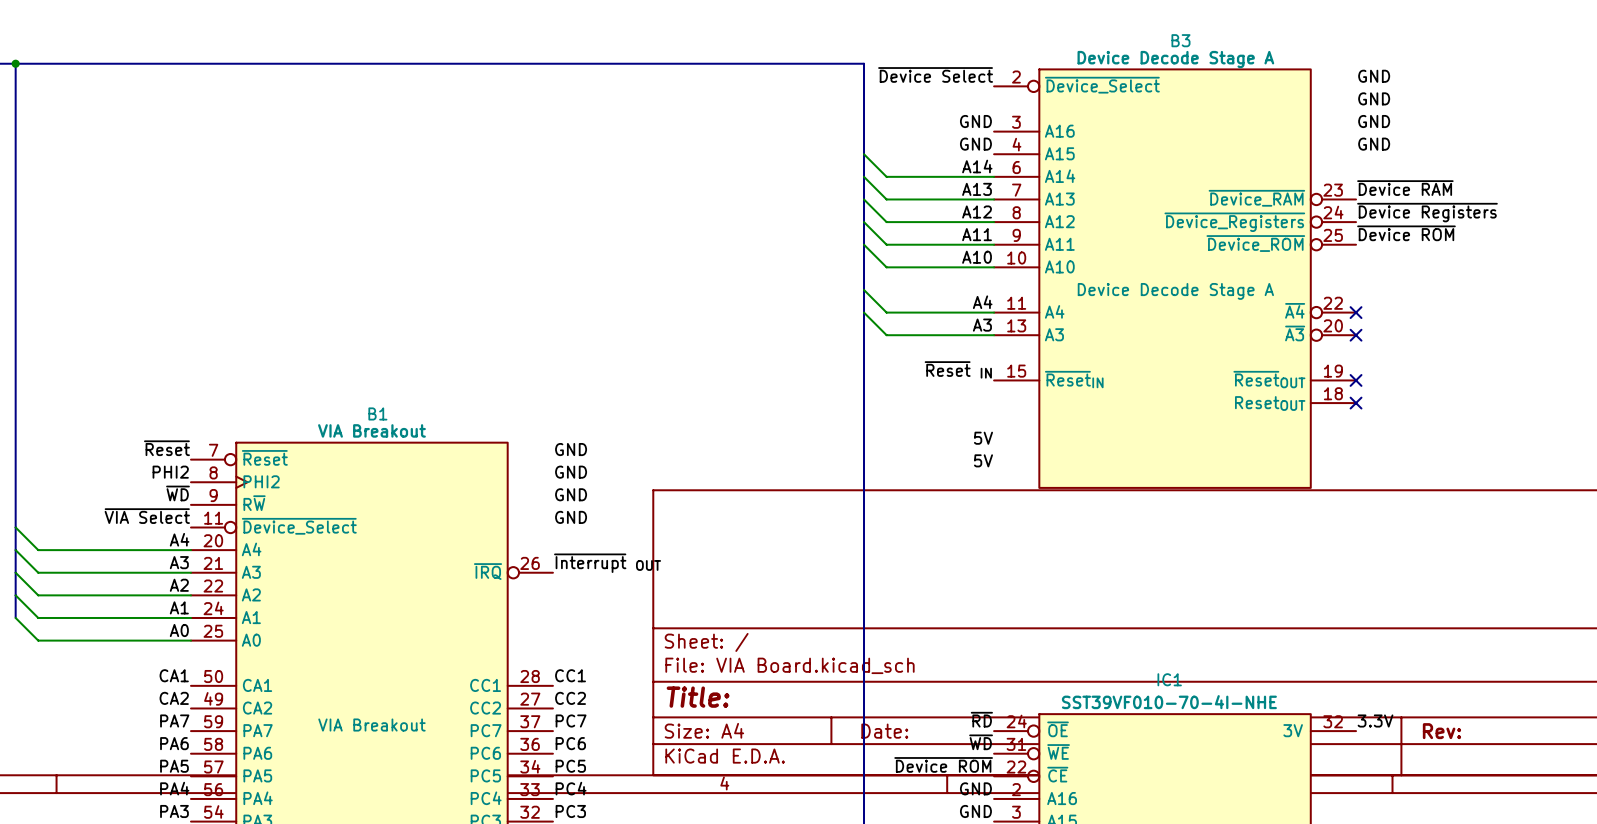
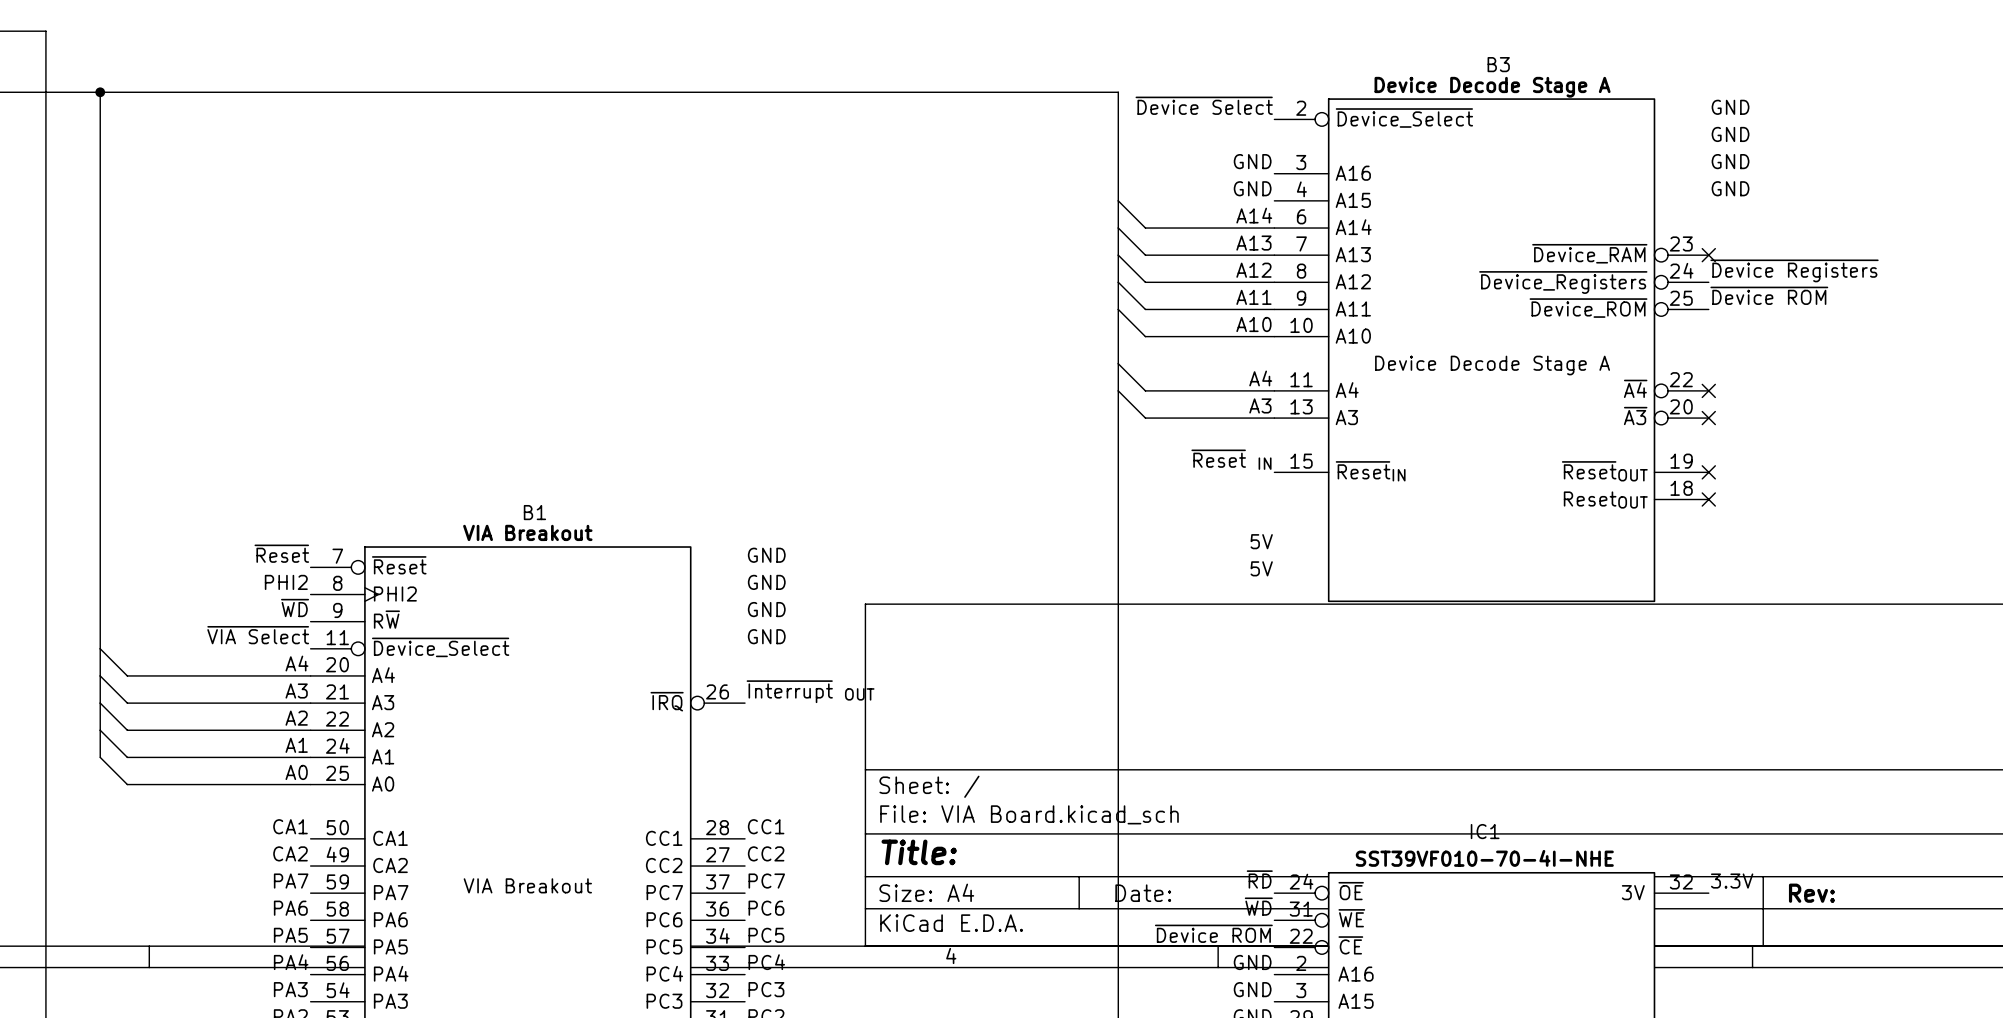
label: ~{Device RAM} (1405, 188) -> none
no-connect mark: none -> (1708, 255)

